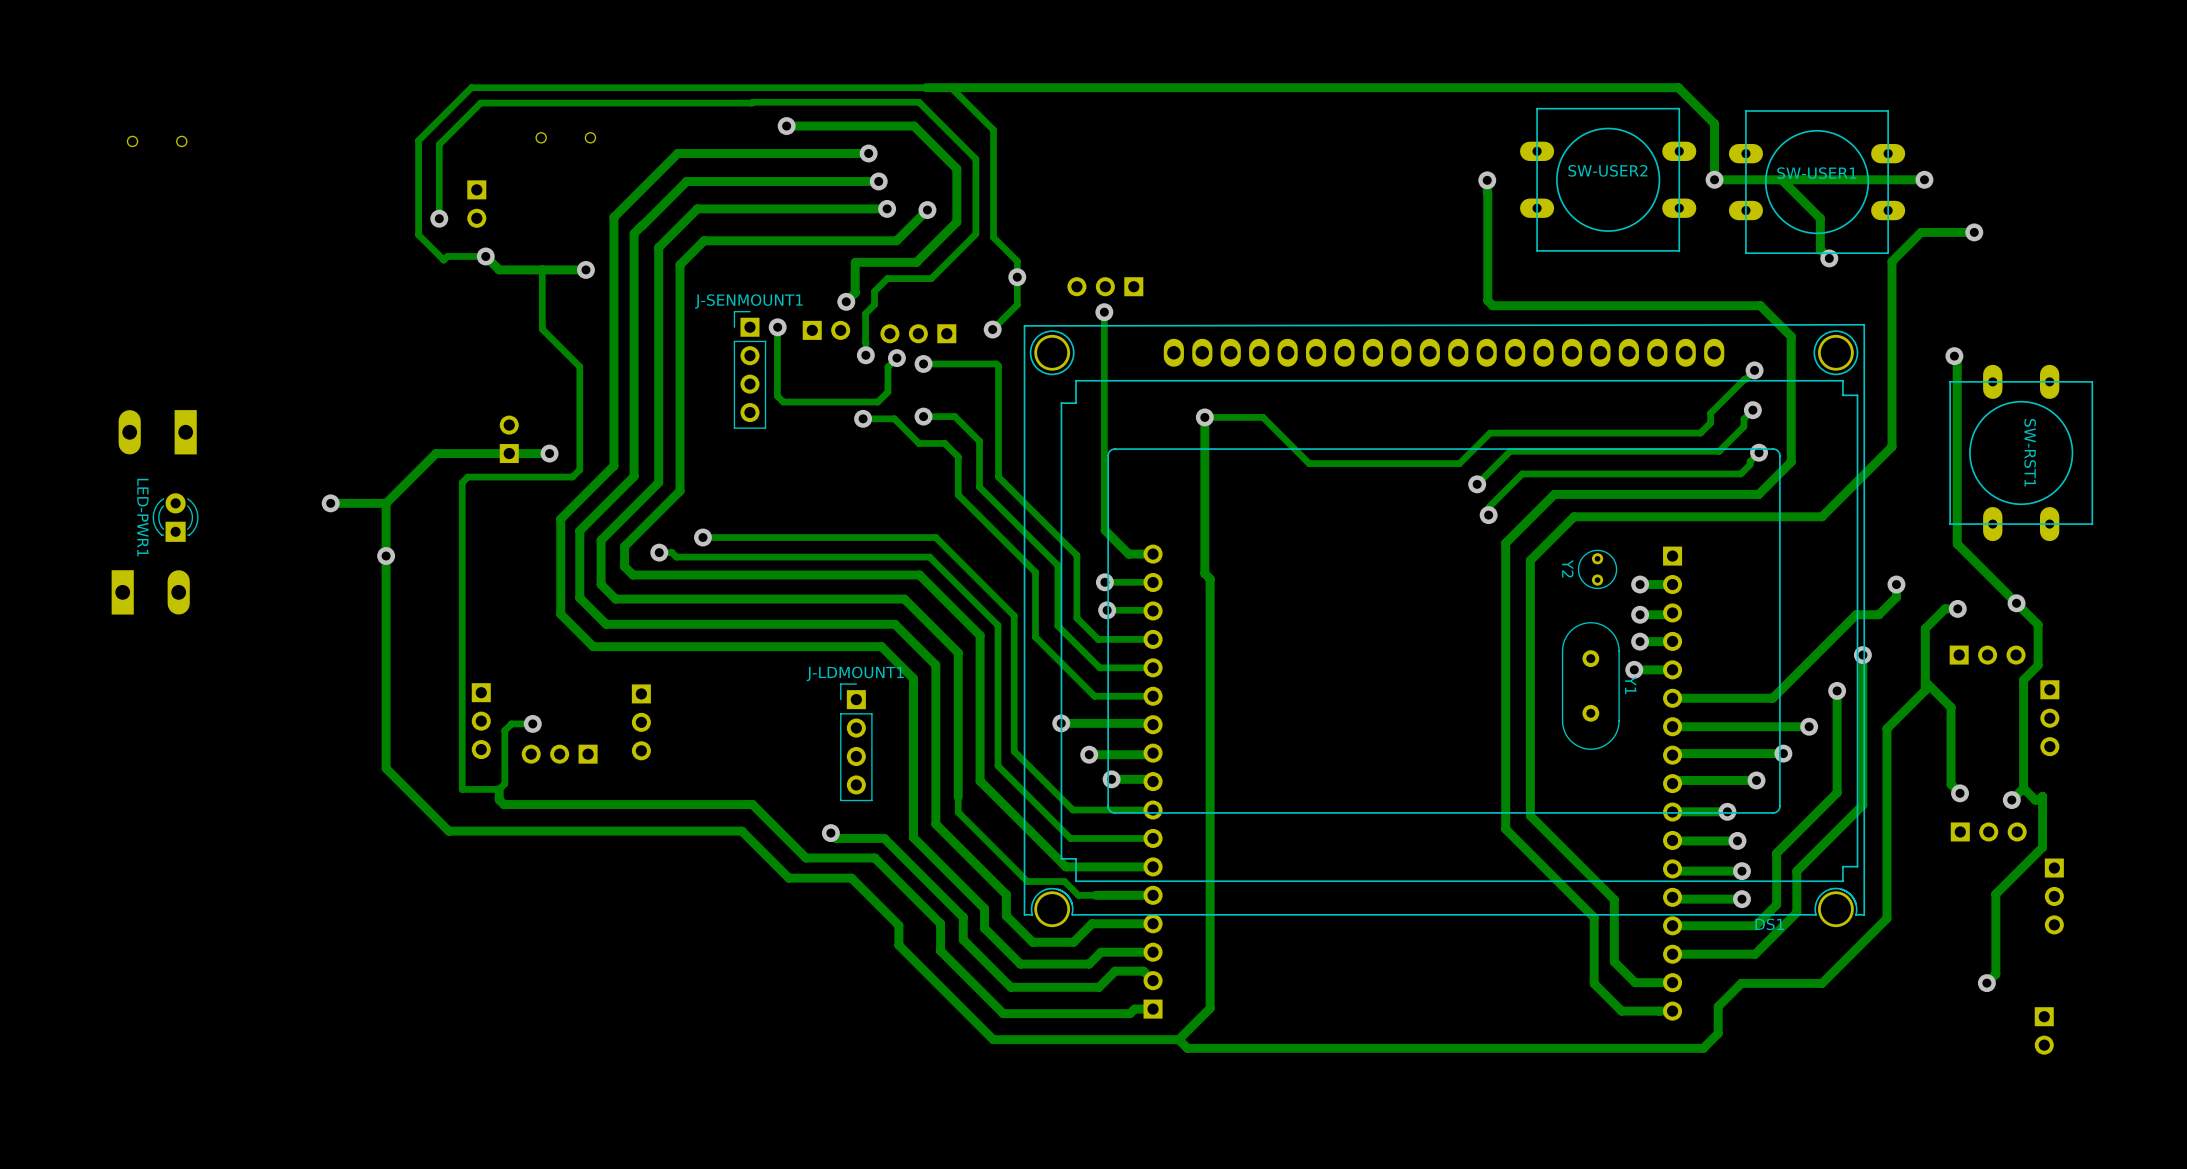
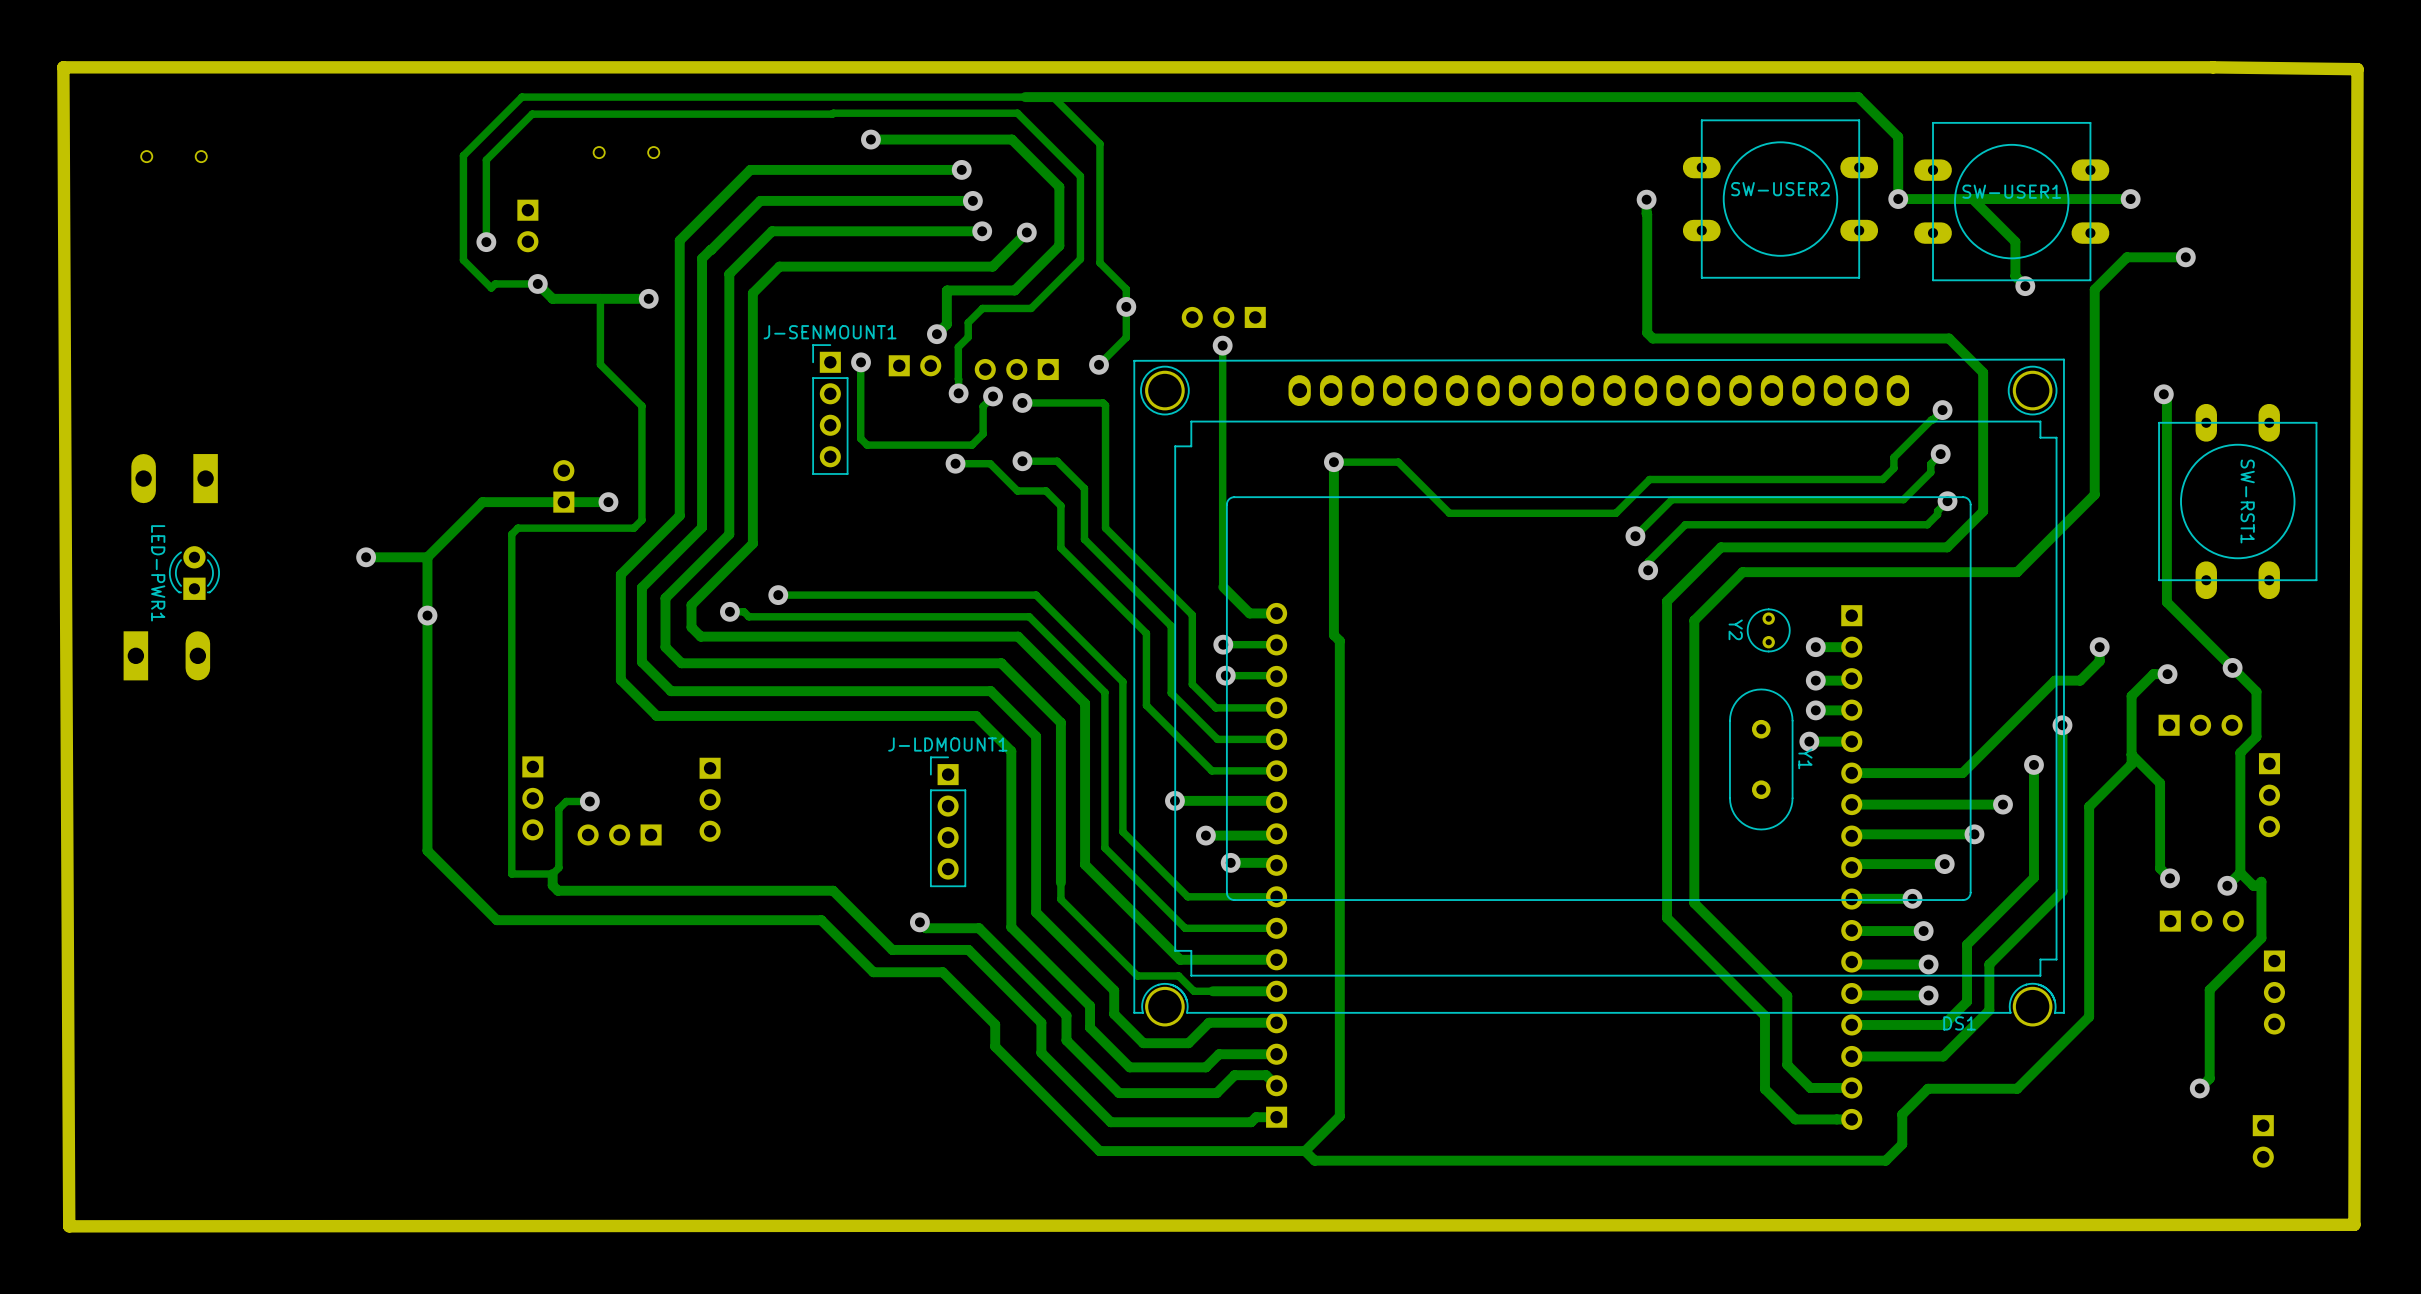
board edge: none -> (2213, 67) (2357, 69) (2354, 1224) (69, 1226) (63, 67) (2213, 67)

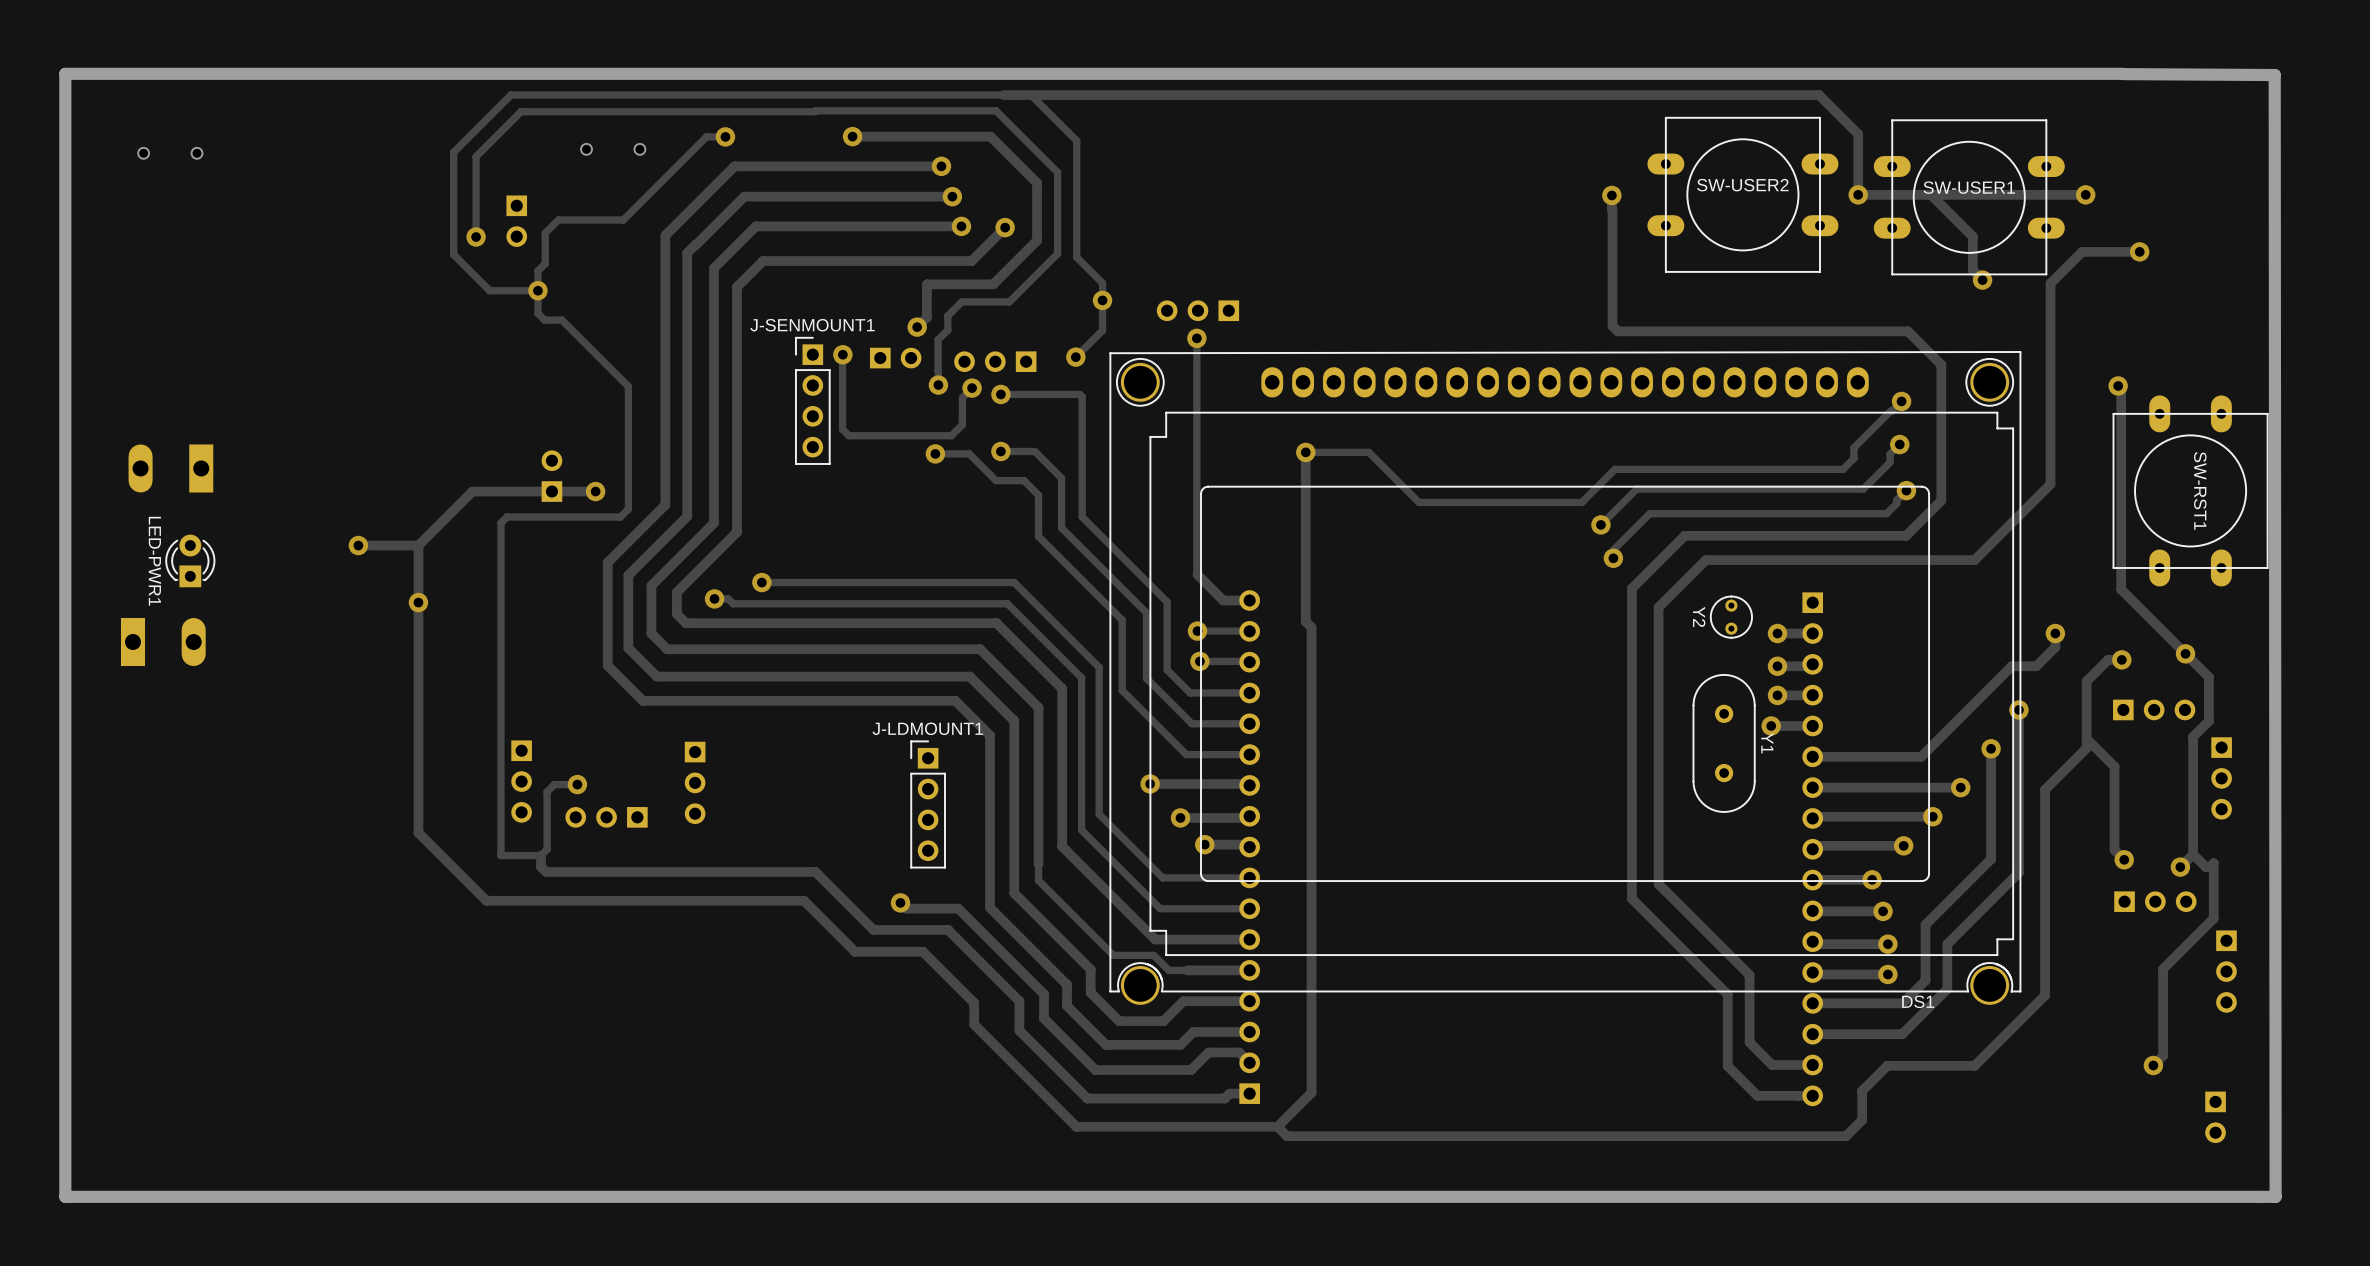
board edge: (2213, 67) (2357, 69) (2354, 1224) (69, 1226) (63, 67) (2213, 67) -> none
board edge: none -> (2123, 73) (65, 73) (65, 1196) (2275, 1196) (2274, 75) (2123, 74)
via: none -> (725, 136)
via position: (537, 283) -> (537, 290)
track: (491, 287) (495, 283) (537, 283) (552, 298) (648, 298) -> (480, 281) (489, 290) (537, 290)
track: (600, 298) (600, 364) (641, 406) -> (725, 136) (706, 136) (623, 220) (558, 220) (545, 233) (545, 263) (537, 270) (537, 313) (544, 320) (561, 320) (628, 386) (628, 397)
via: (648, 298) -> none

